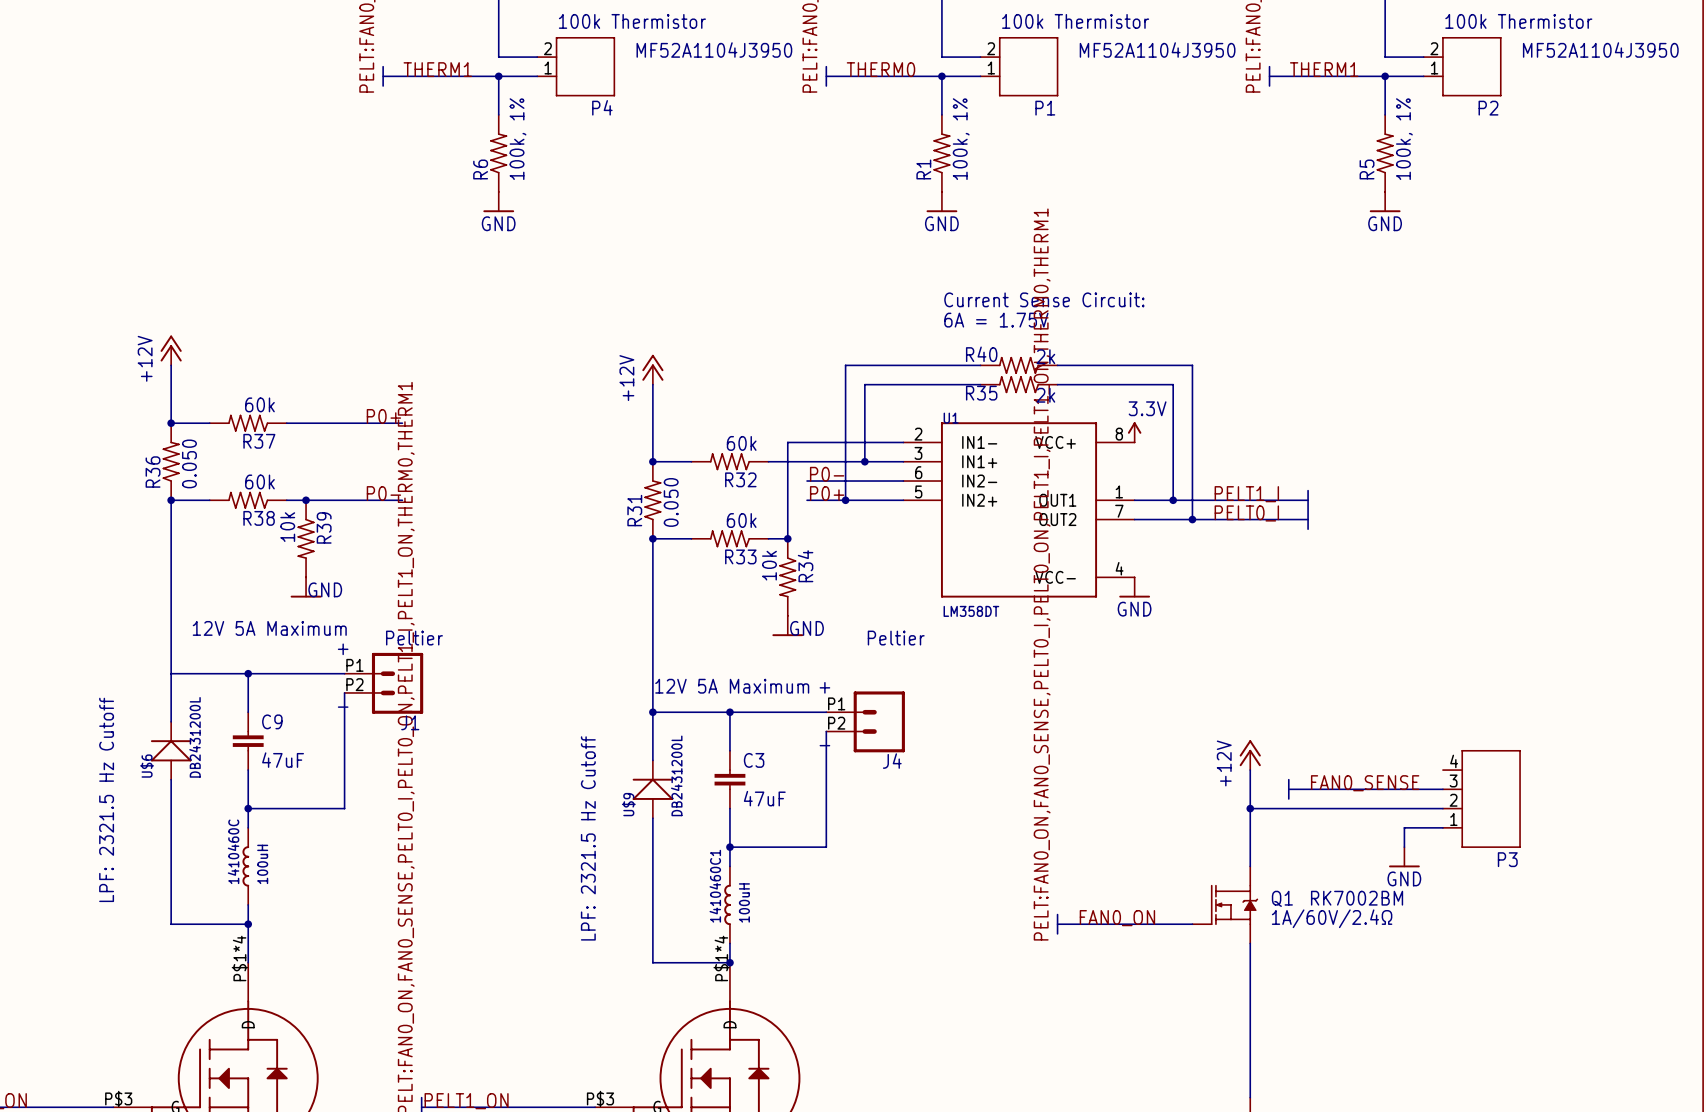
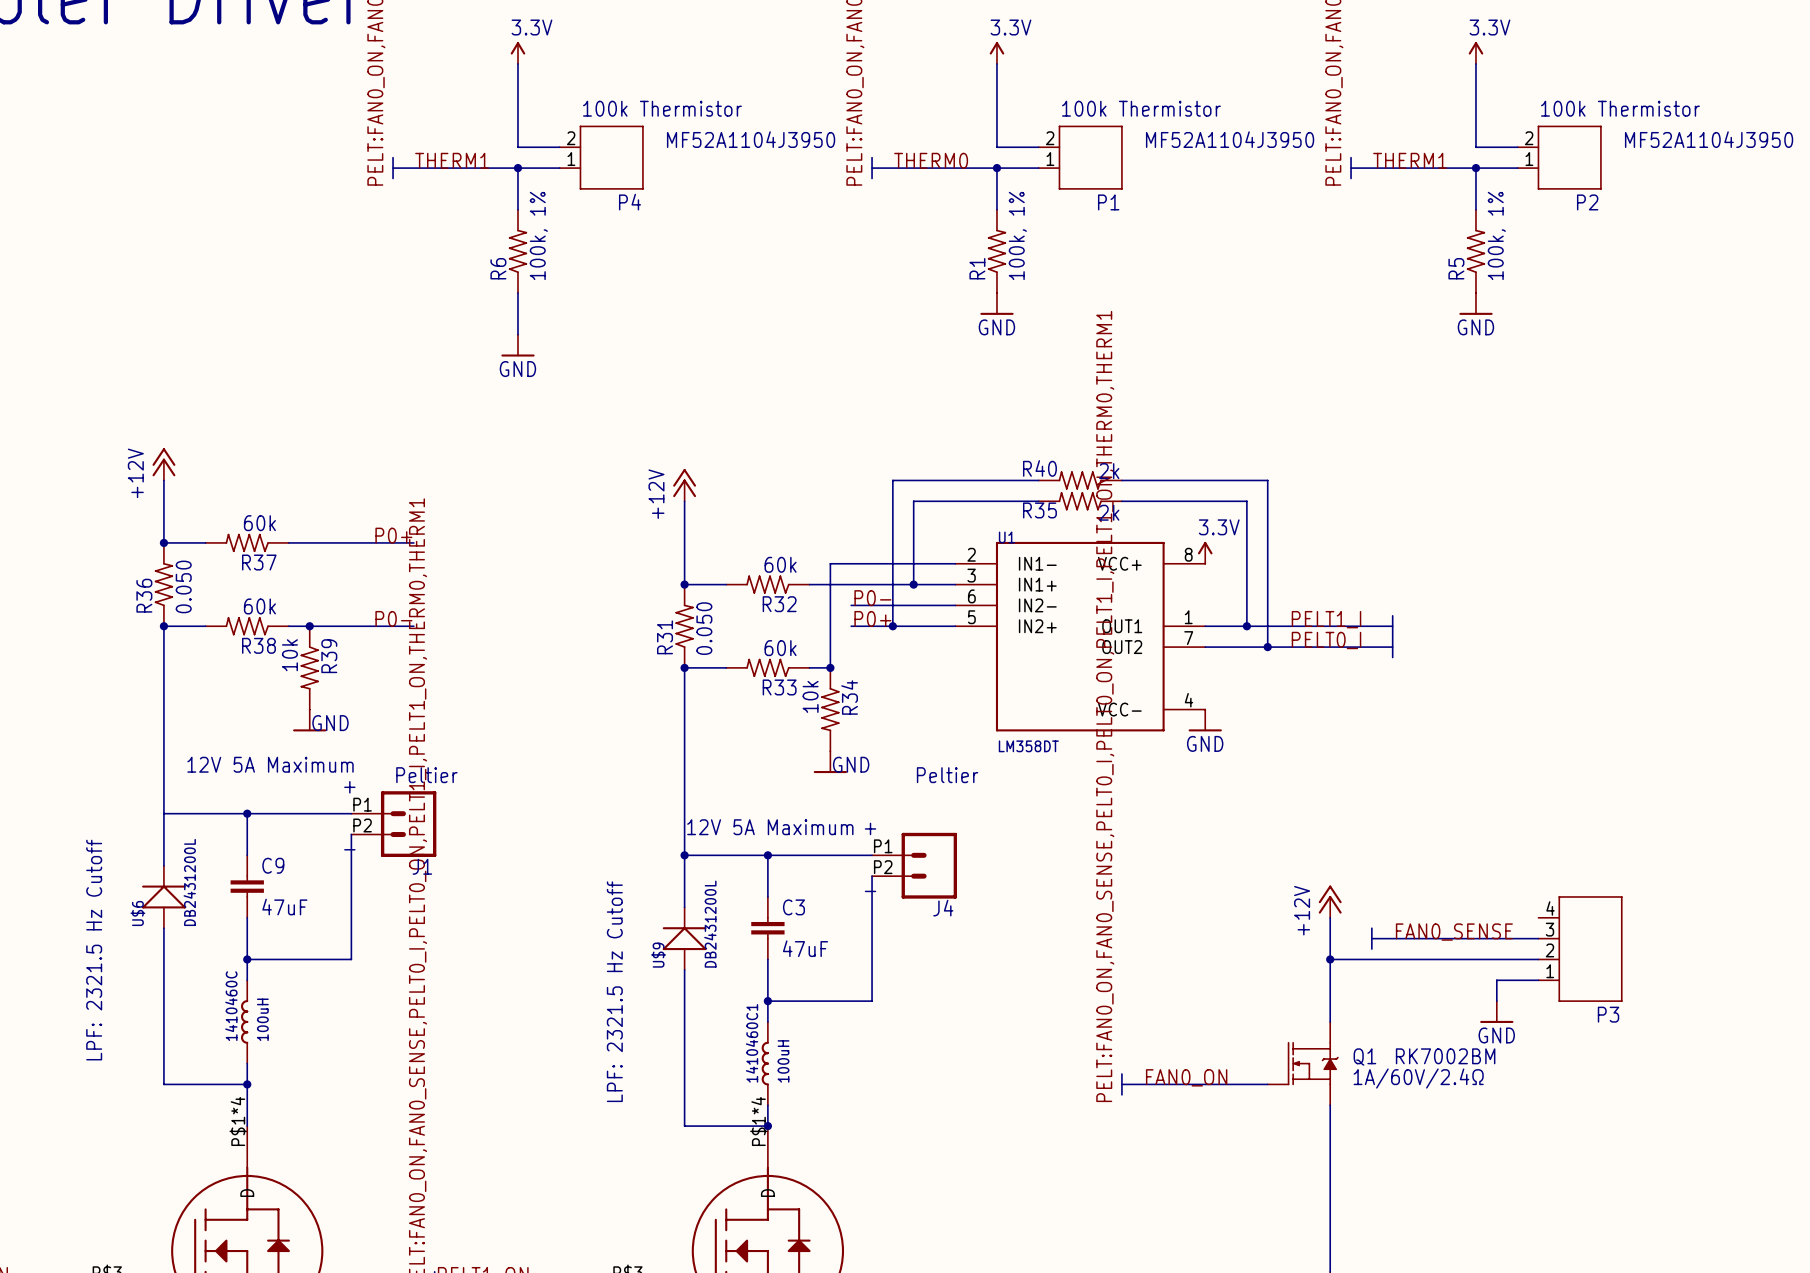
power symbol position: GND (498, 202) -> GND (517, 345)
text: Current Sense Circuit: (1044, 299) -> none
text: 6A = 1.75V (996, 320) -> none

